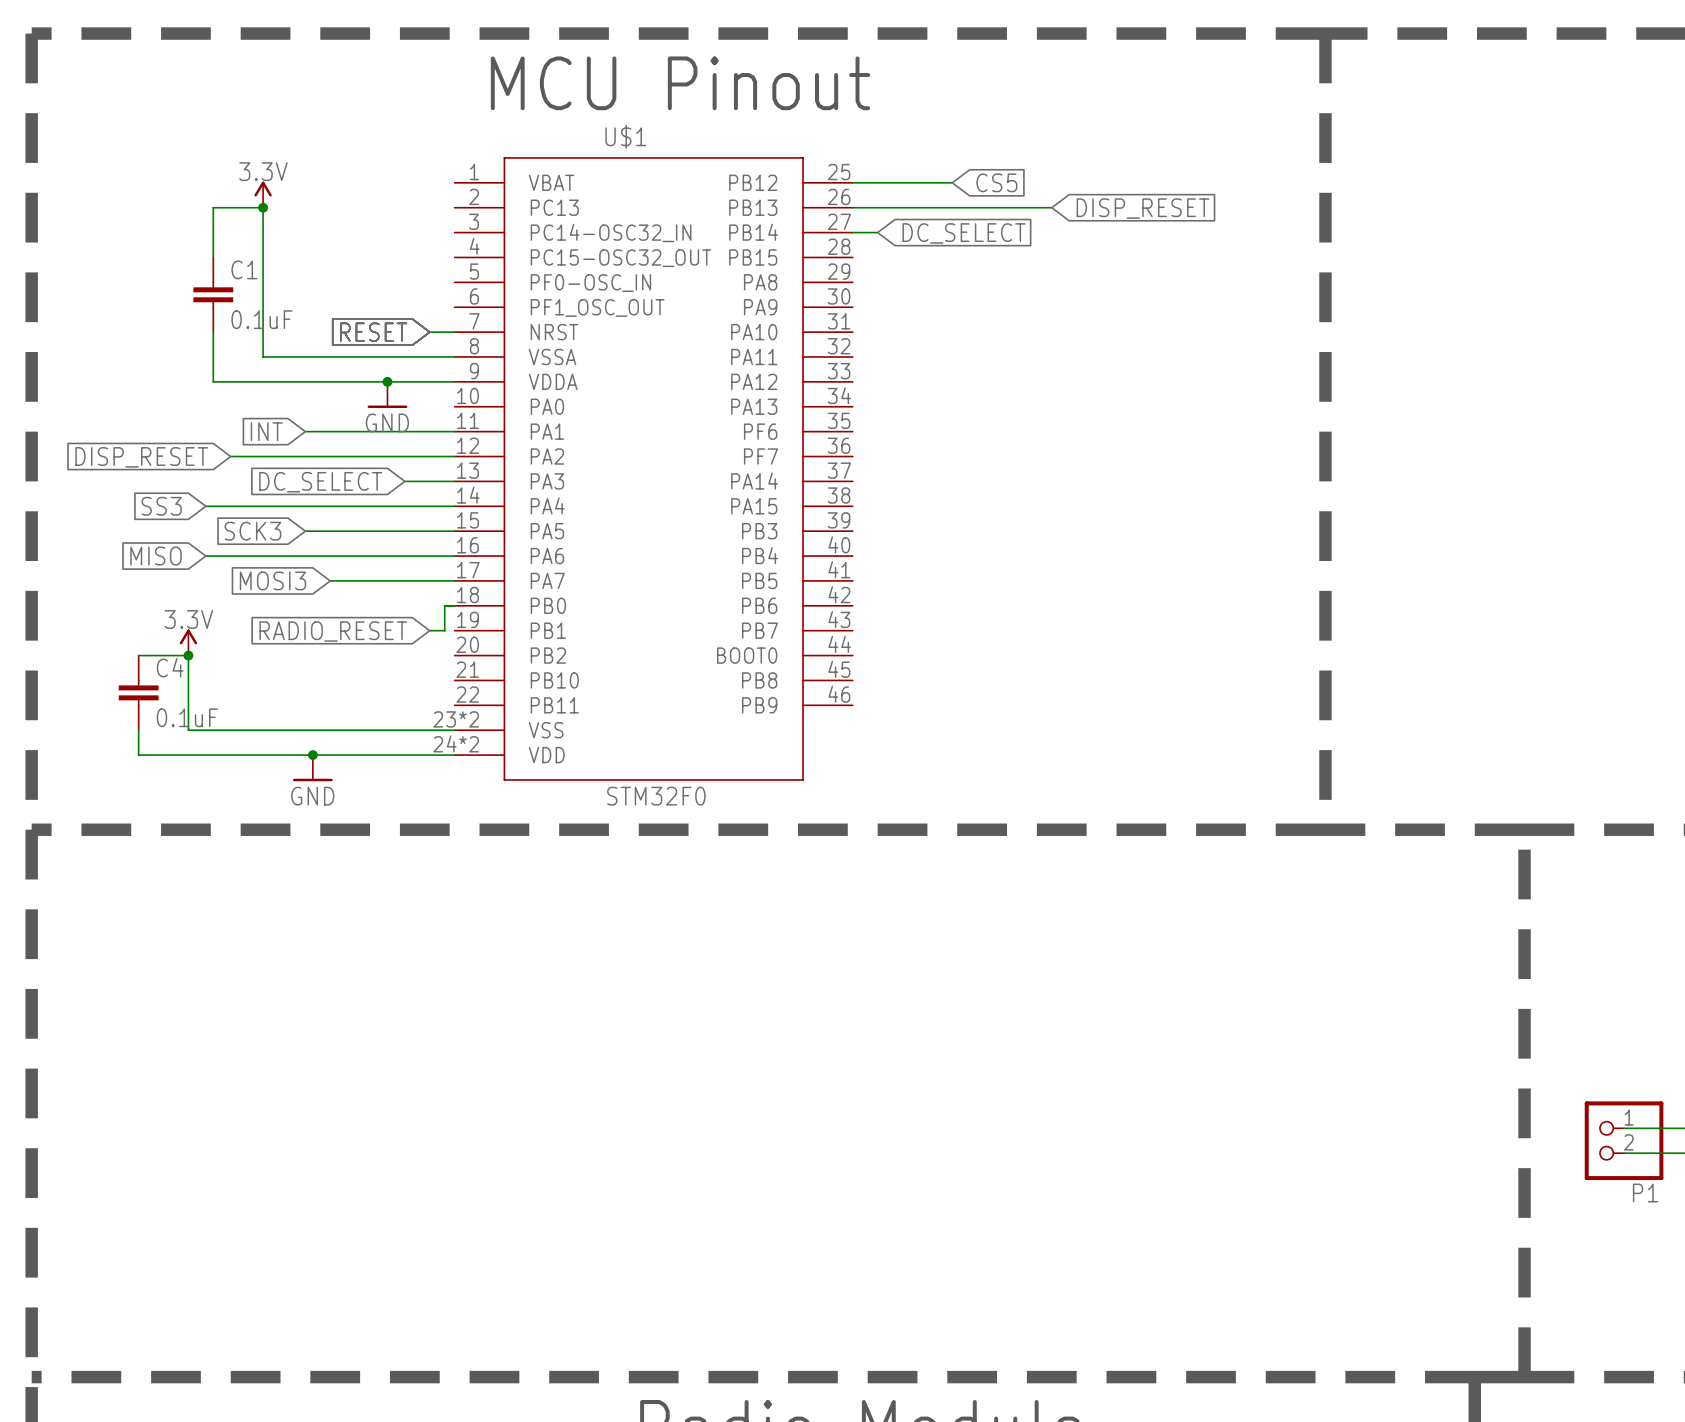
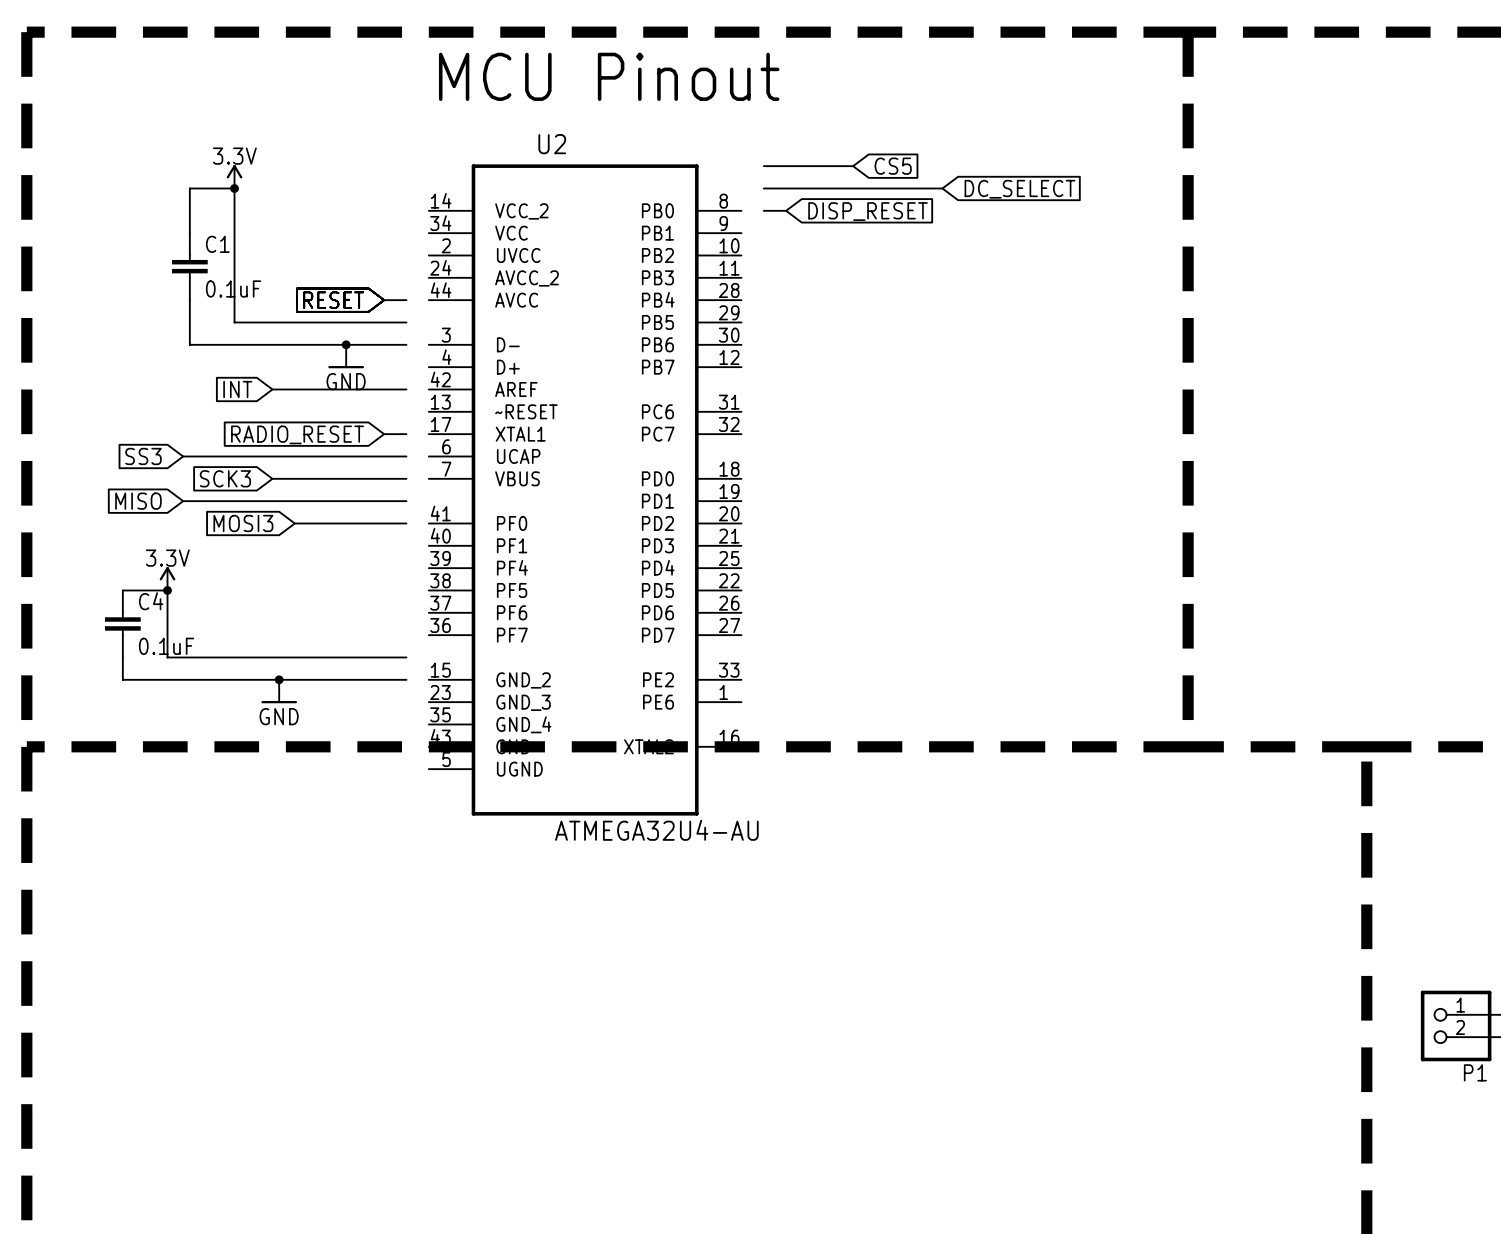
global label: DISP_RESET (1143, 208) -> DC_SELECT (1020, 189)
global label: DC_SELECT (964, 233) -> DISP_RESET (868, 211)
wire: (230, 456) (454, 456) -> none
global label: DISP_RESET (141, 457) -> none
U$1: STM32F0 (653, 468) -> none
wire: (404, 481) (429, 481) -> none
global label: DC_SELECT (320, 482) -> none
U2: none -> ATMEGA32U4-AU (585, 489)
wire: (454, 605) (444, 605) (444, 630) (429, 630) -> none
global label position: RADIO_RESET (333, 631) -> RADIO_RESET (297, 434)

